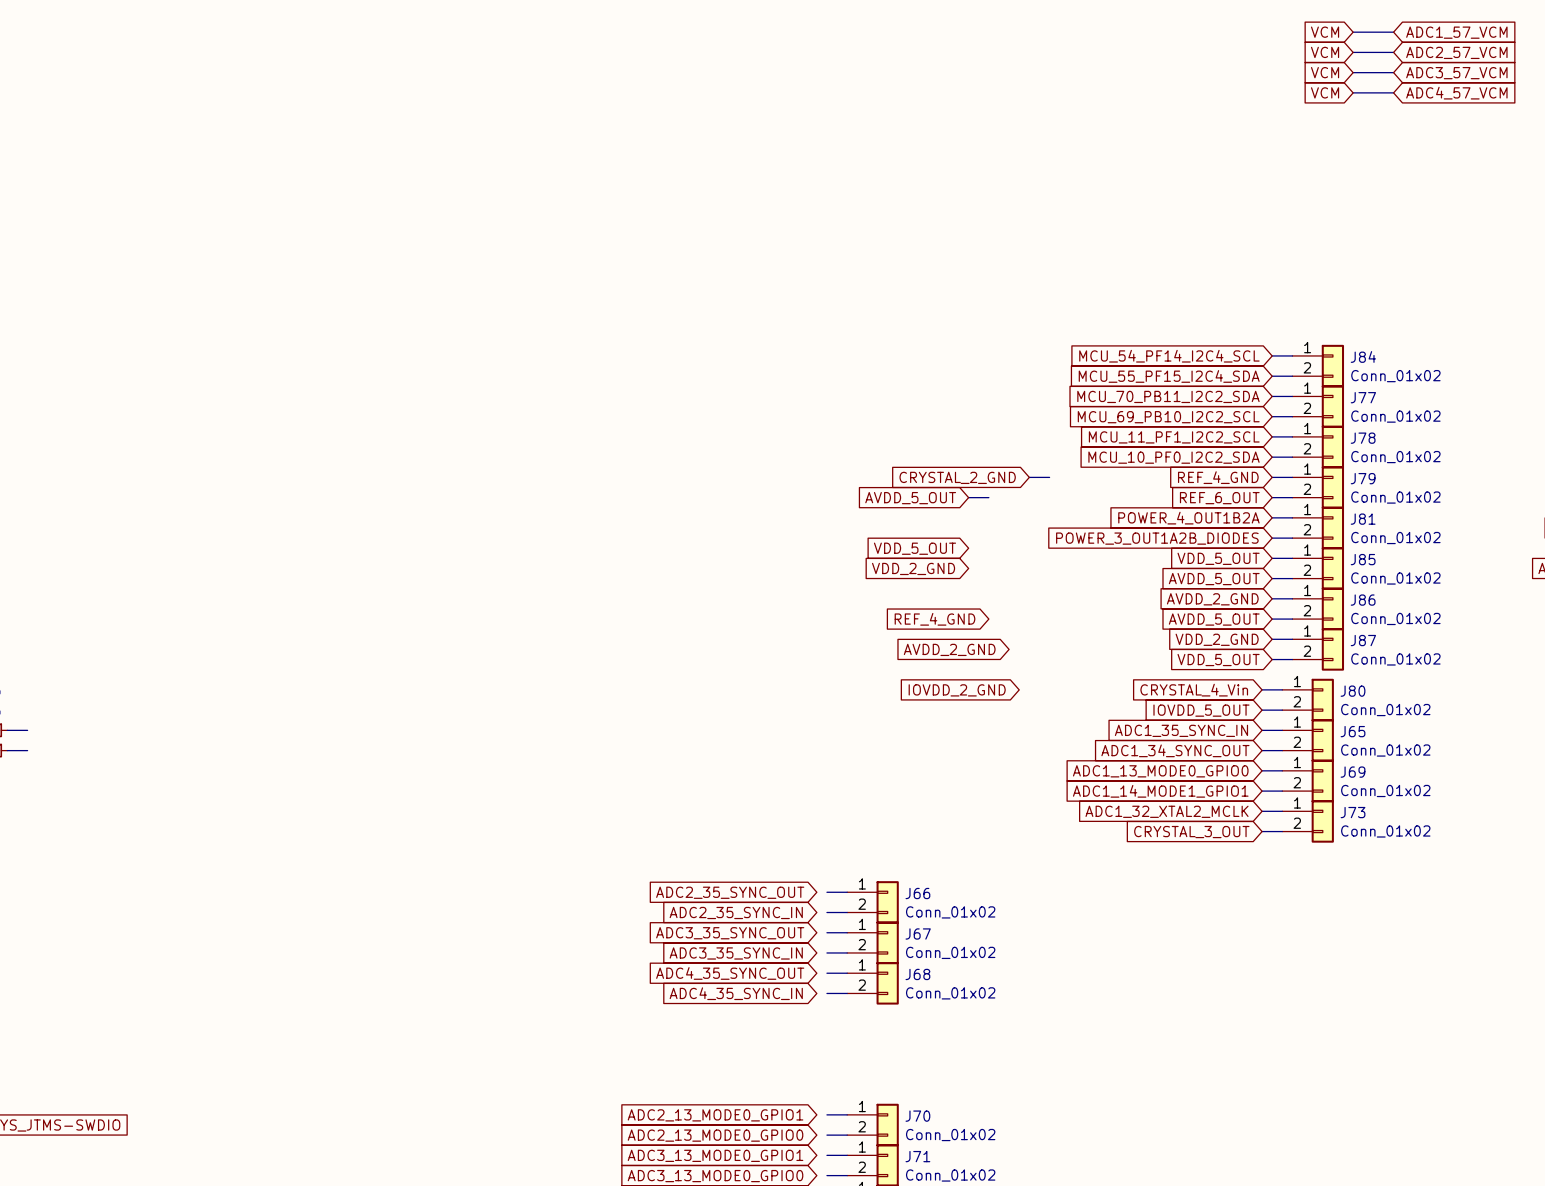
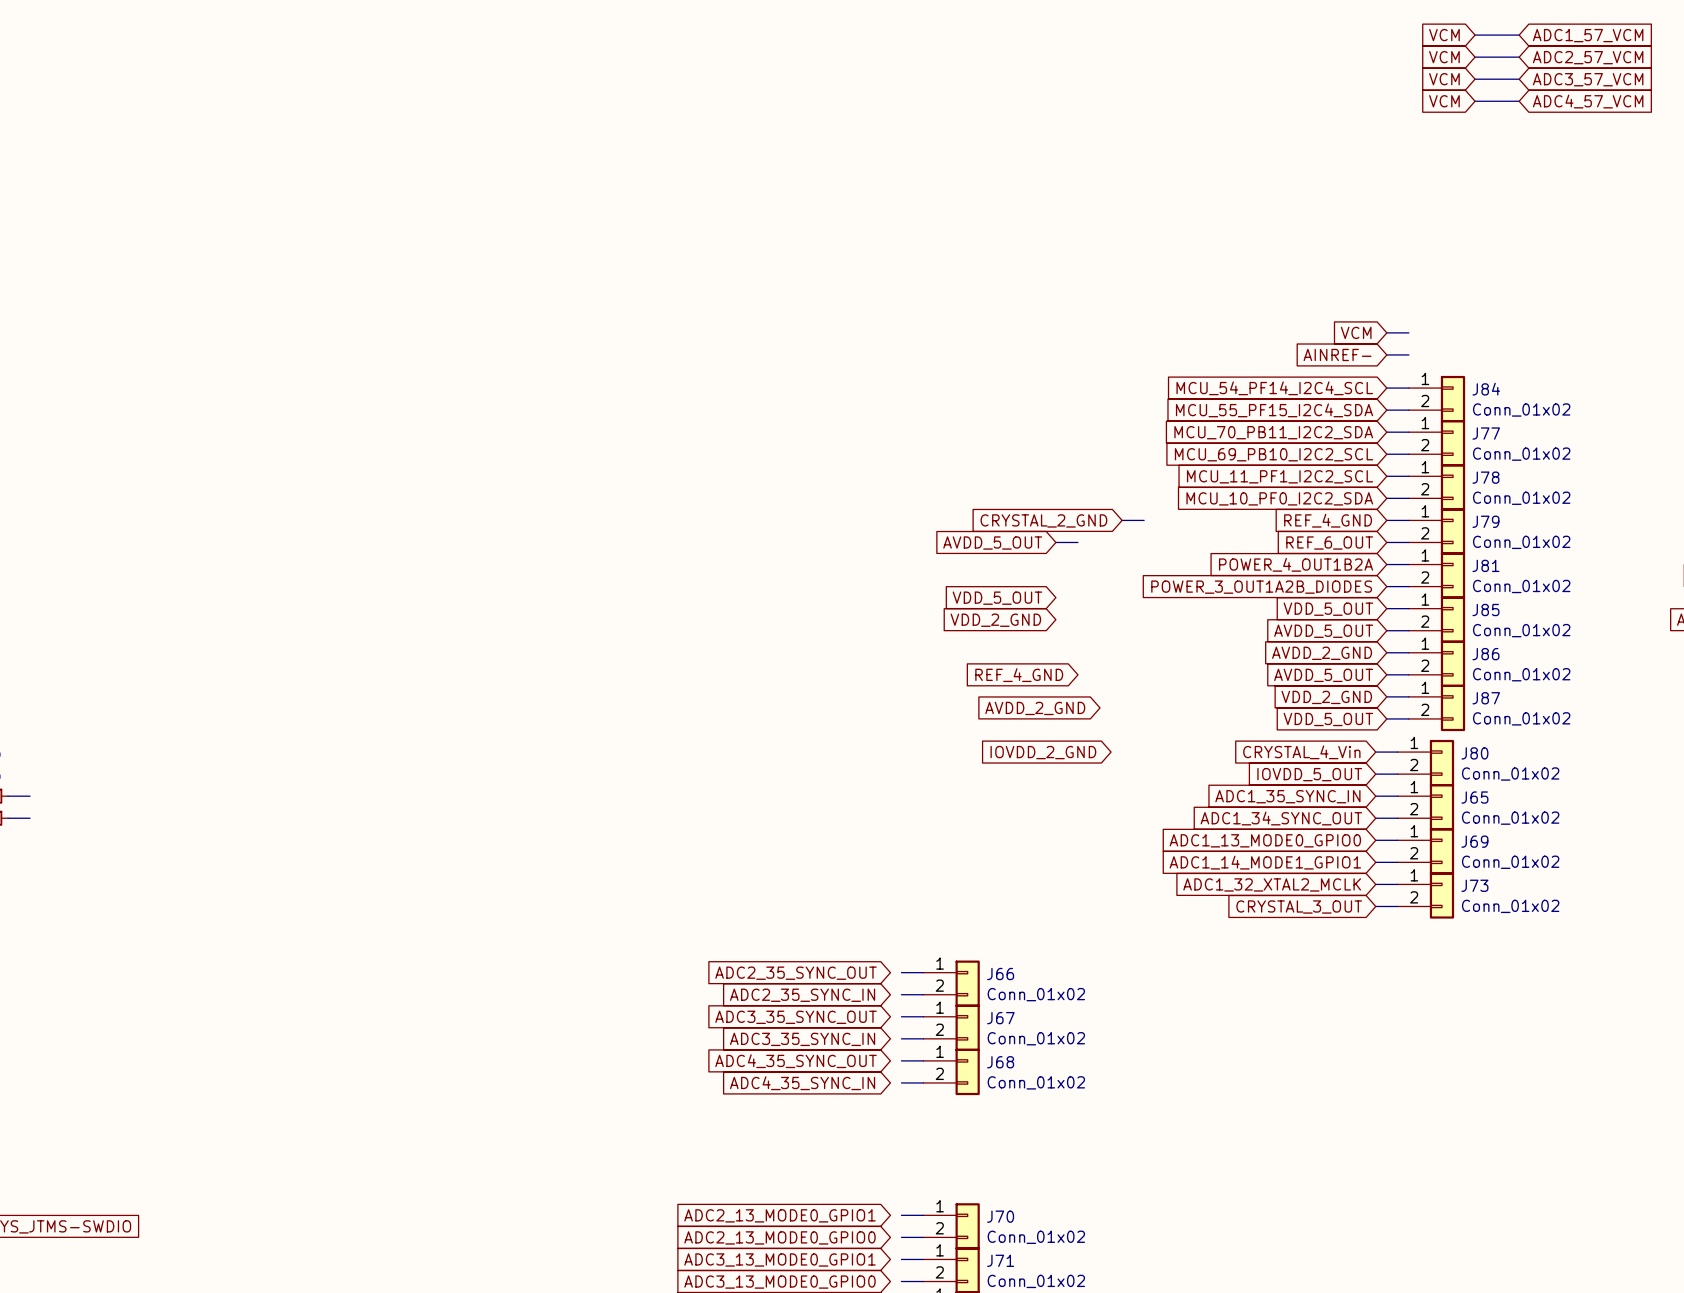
global label: none -> VCM (1356, 332)
wire: none -> (1386, 332) (1408, 332)
global label: none -> AINREF- (1337, 354)
wire: none -> (1386, 354) (1408, 354)

